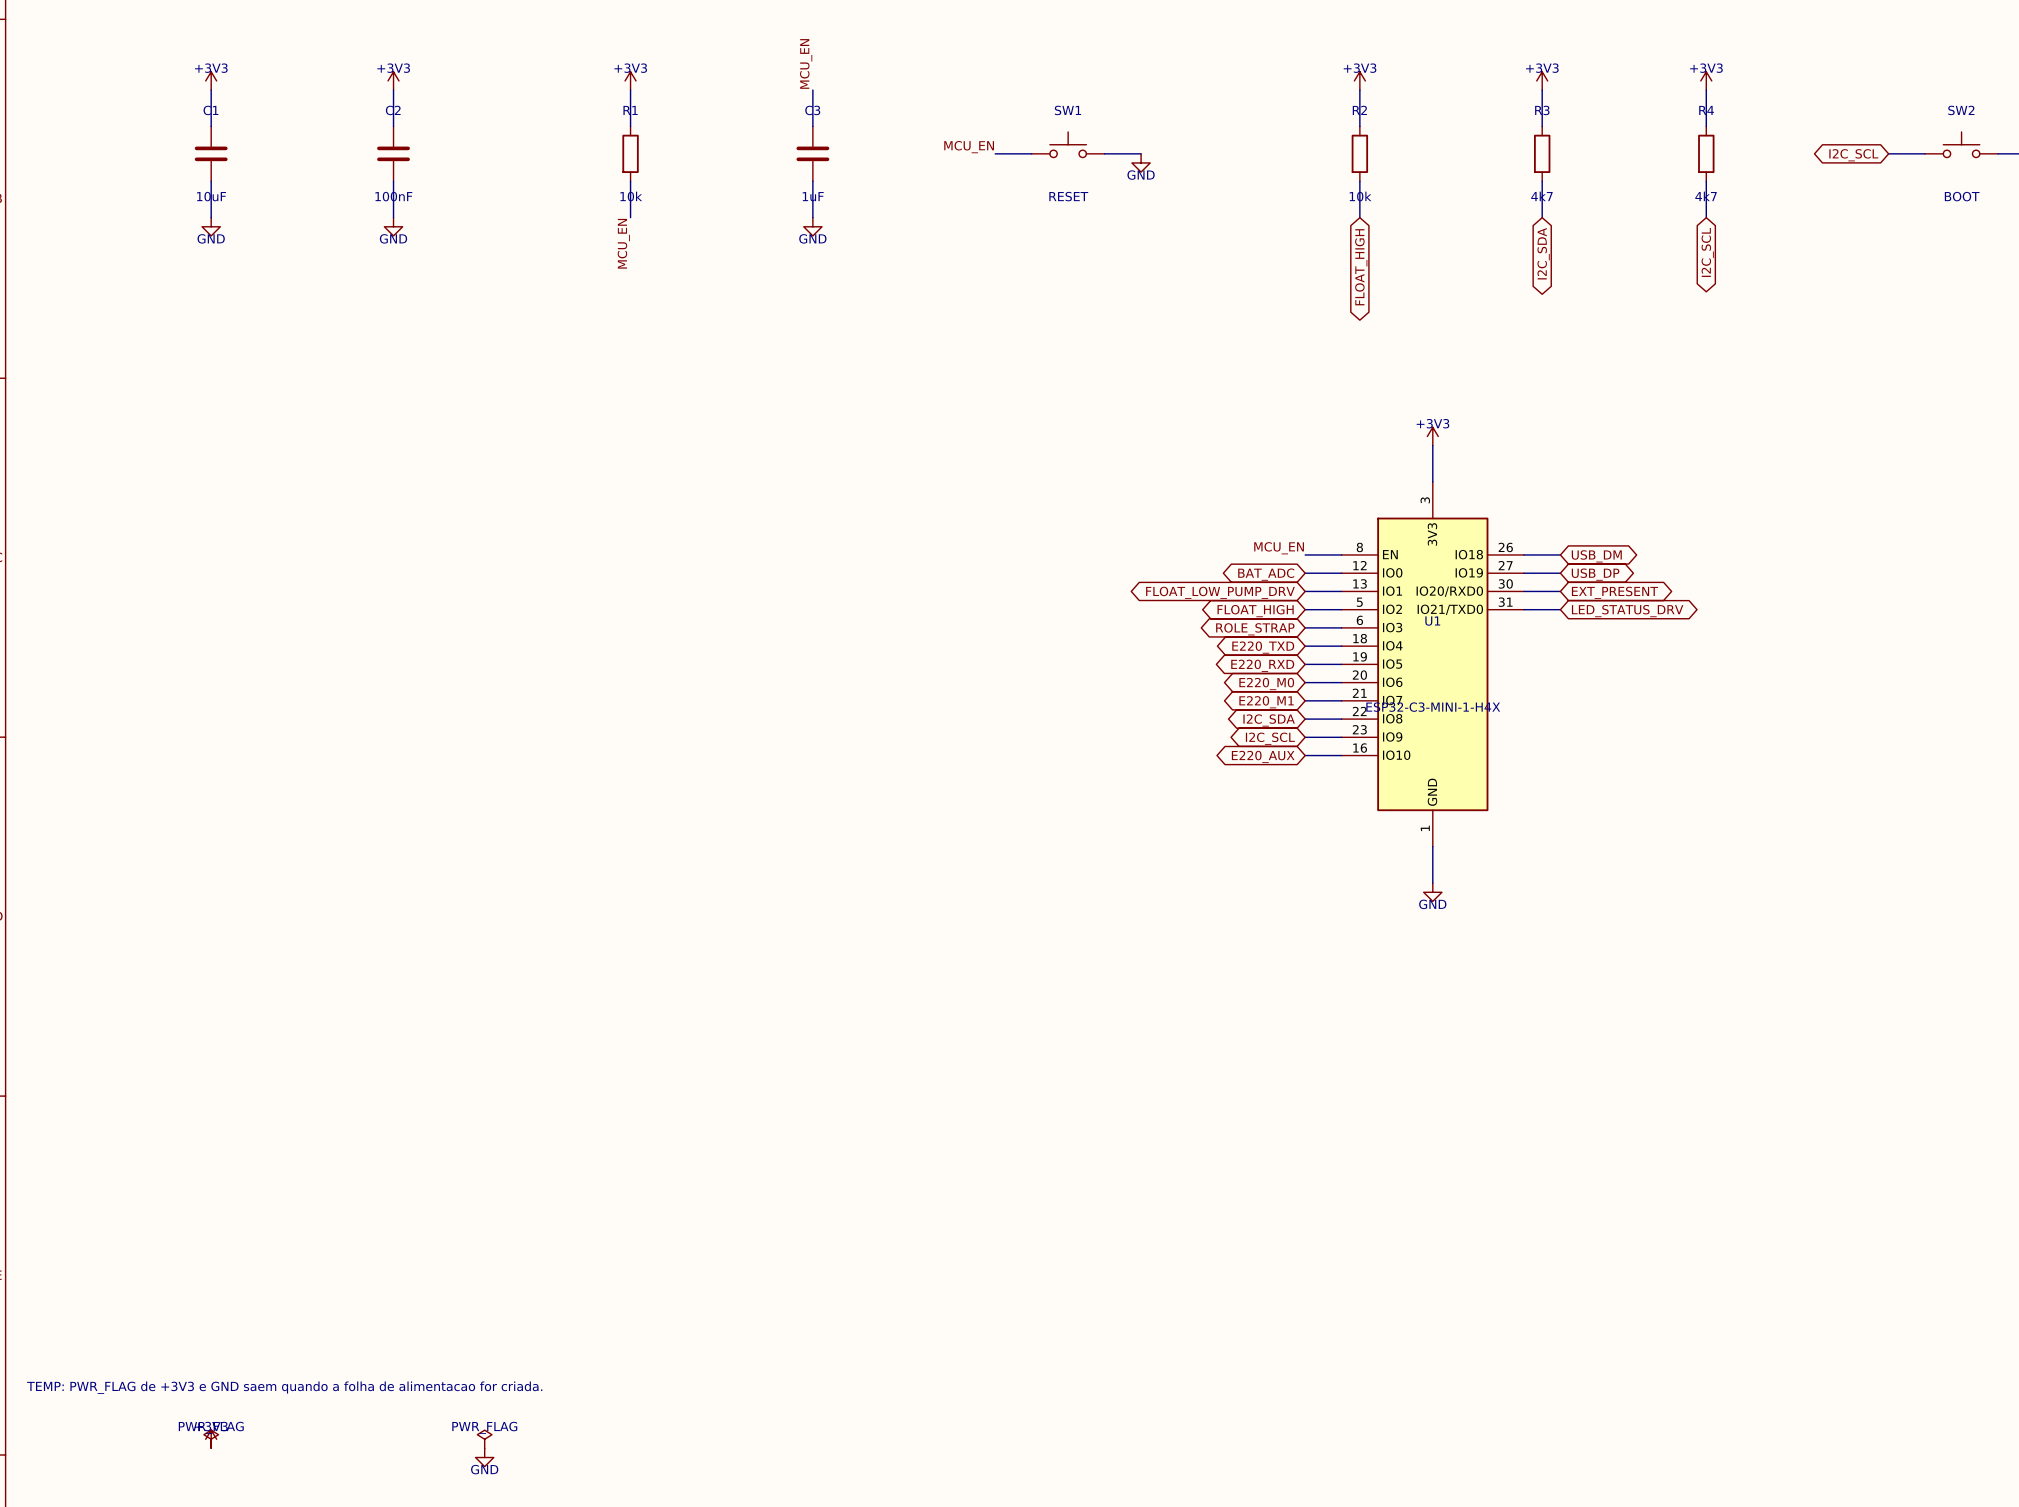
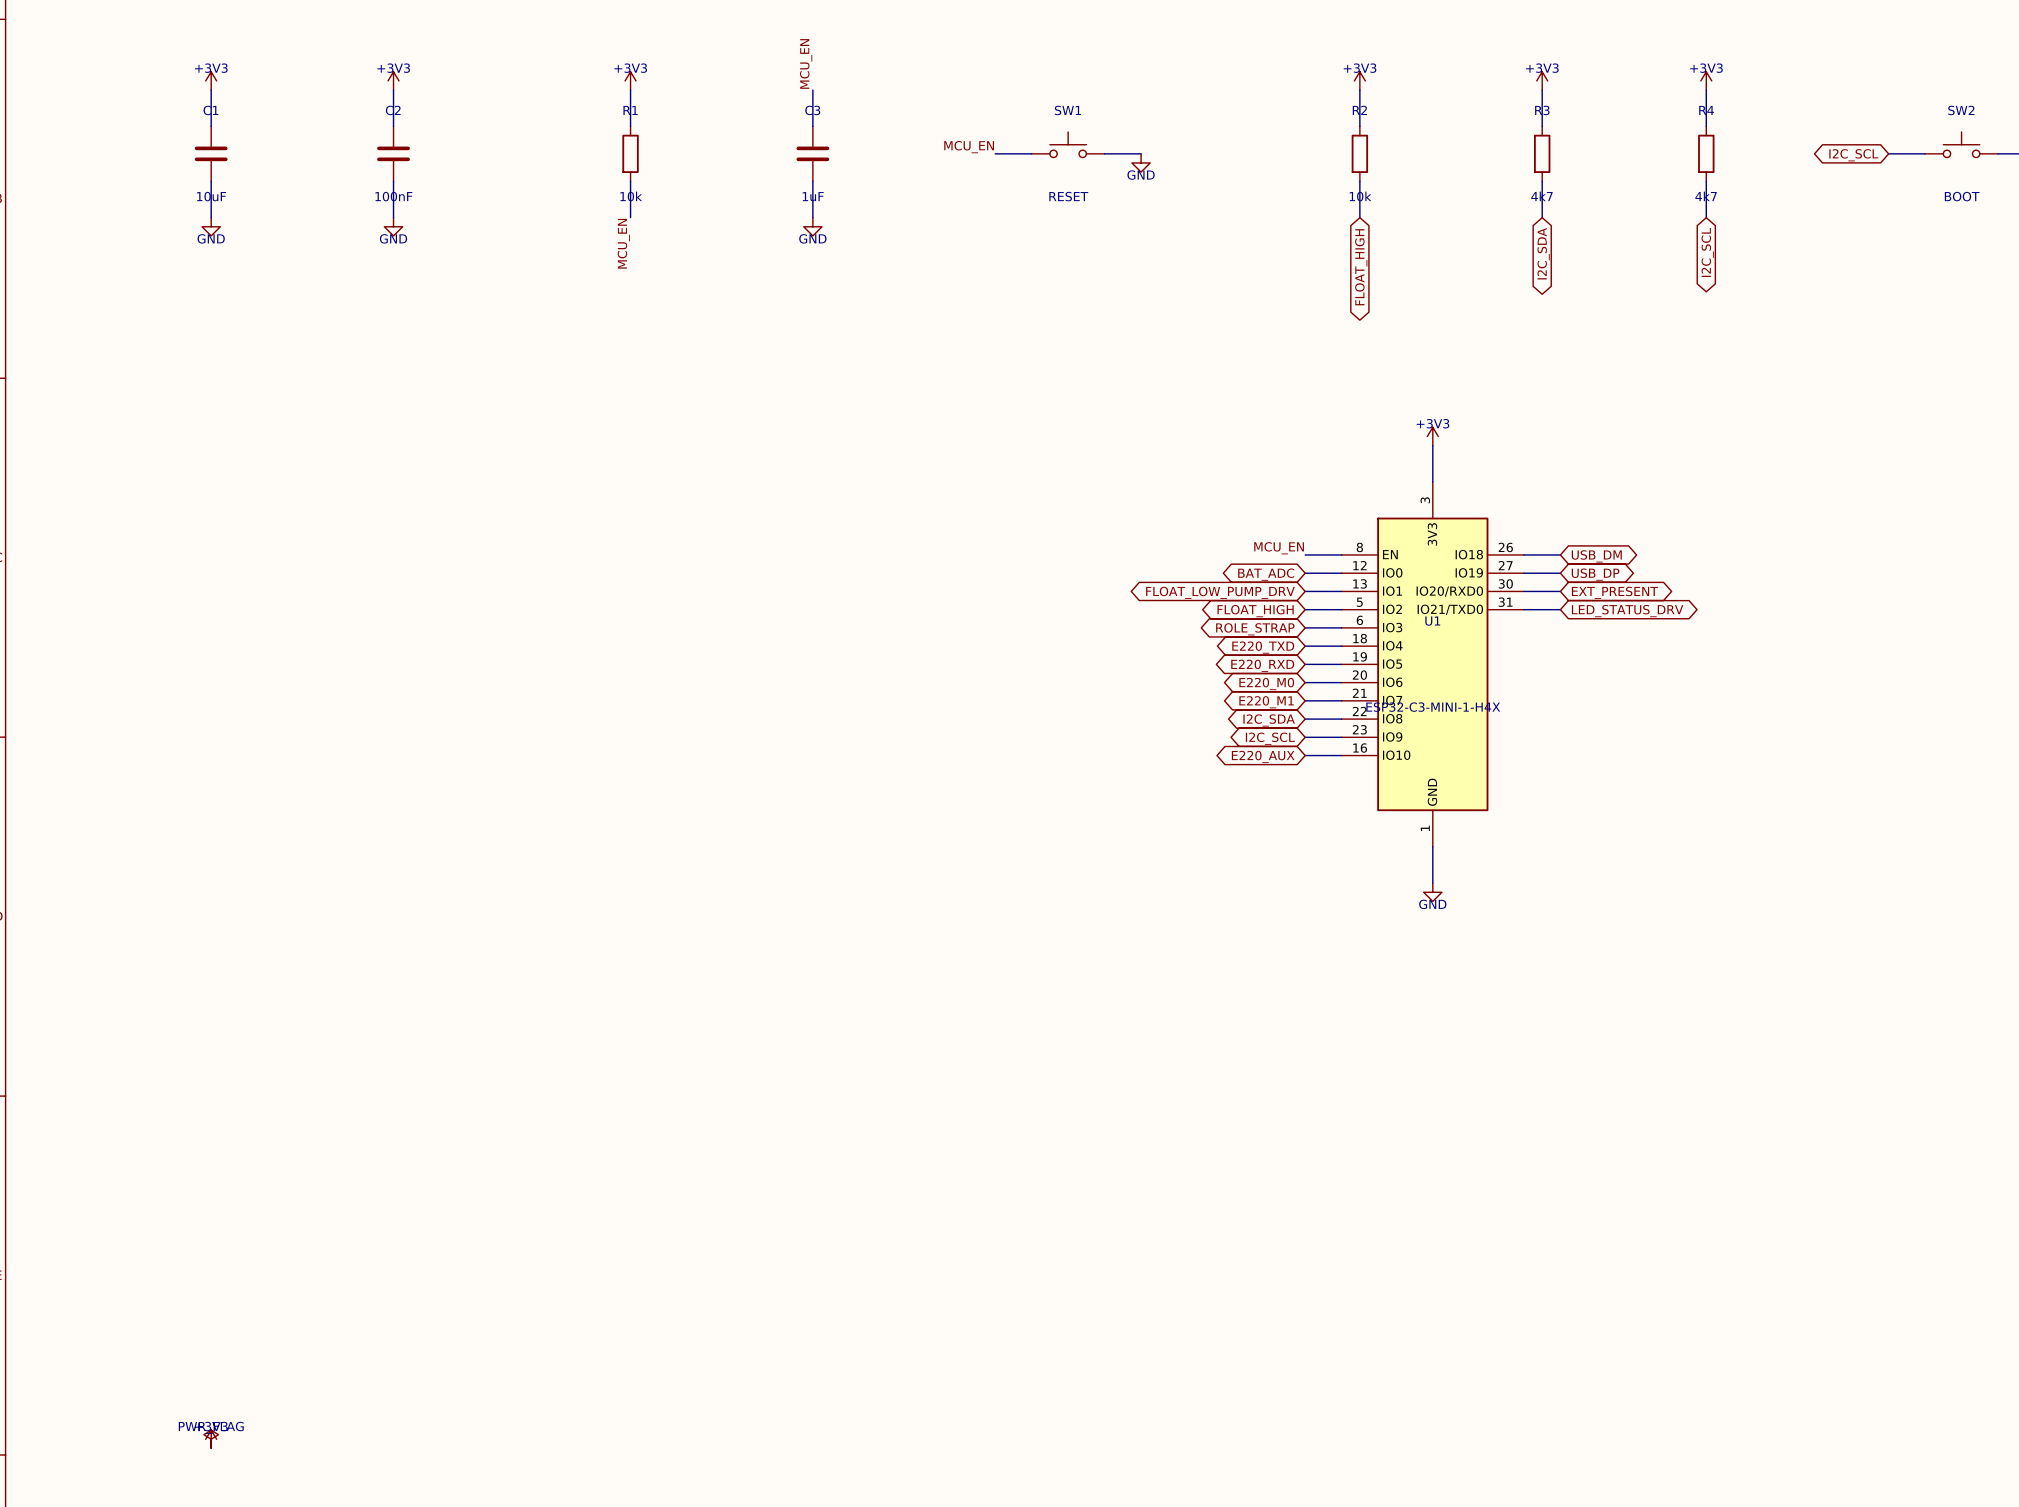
text: TEMP: PWR_FLAG de +3V3 e GND saem quando a folha de alimentacao for criada. (284, 1387) -> none
power symbol: PWR_FLAG (484, 1439) -> none
power symbol: GND (484, 1457) -> none

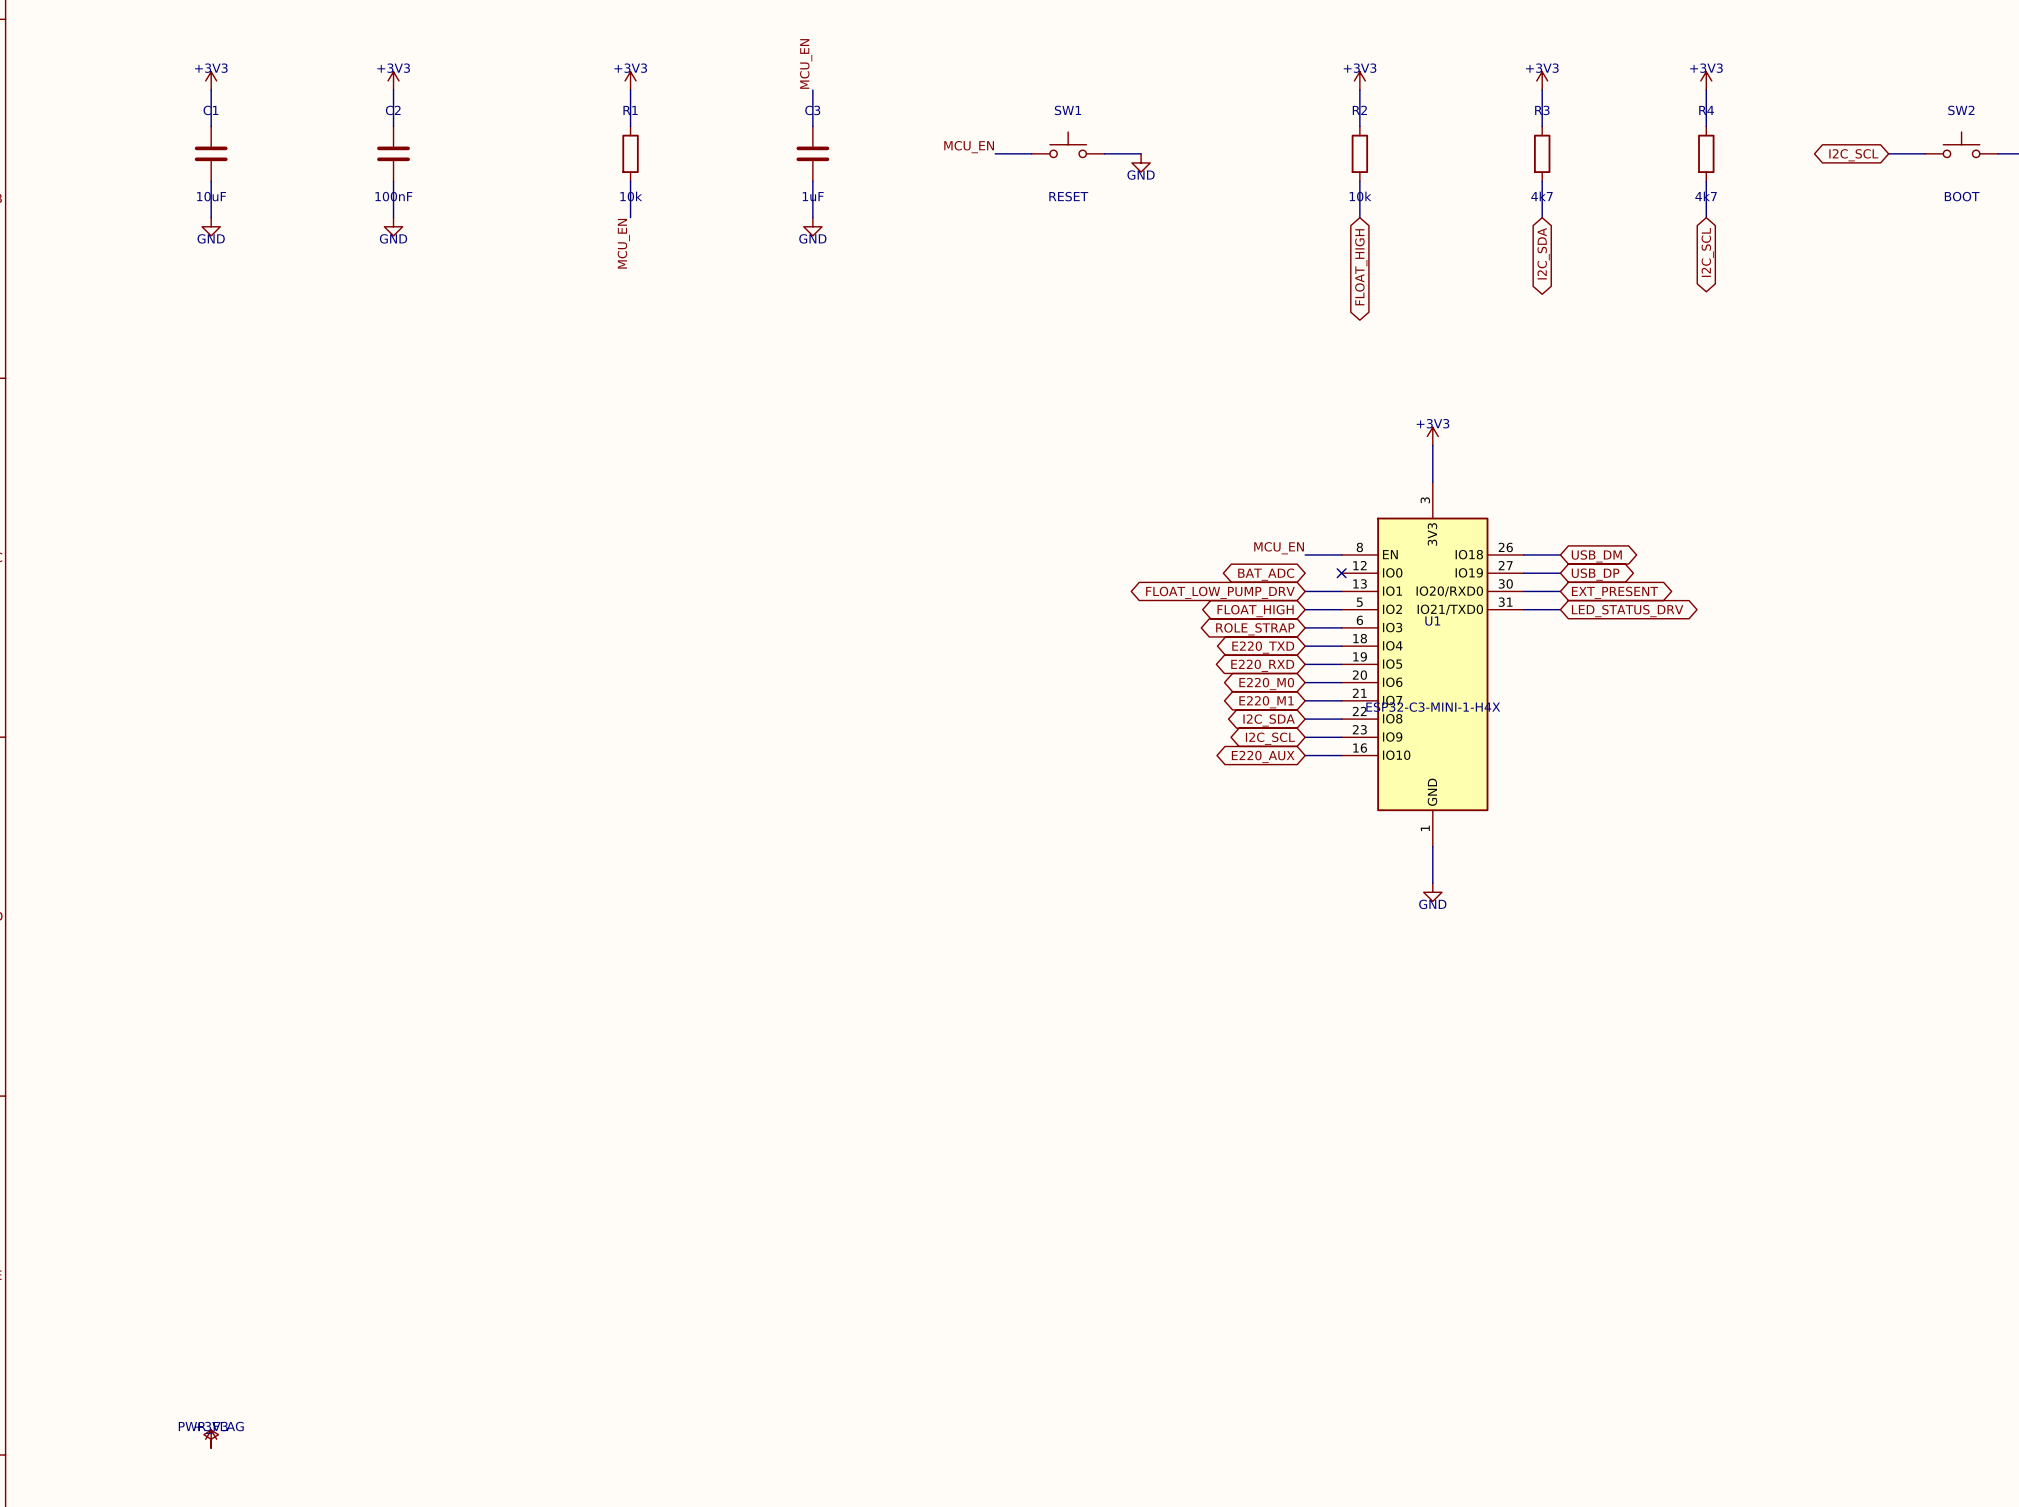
wire: (1305, 573) (1341, 573) -> none
no-connect mark: none -> (1341, 573)

